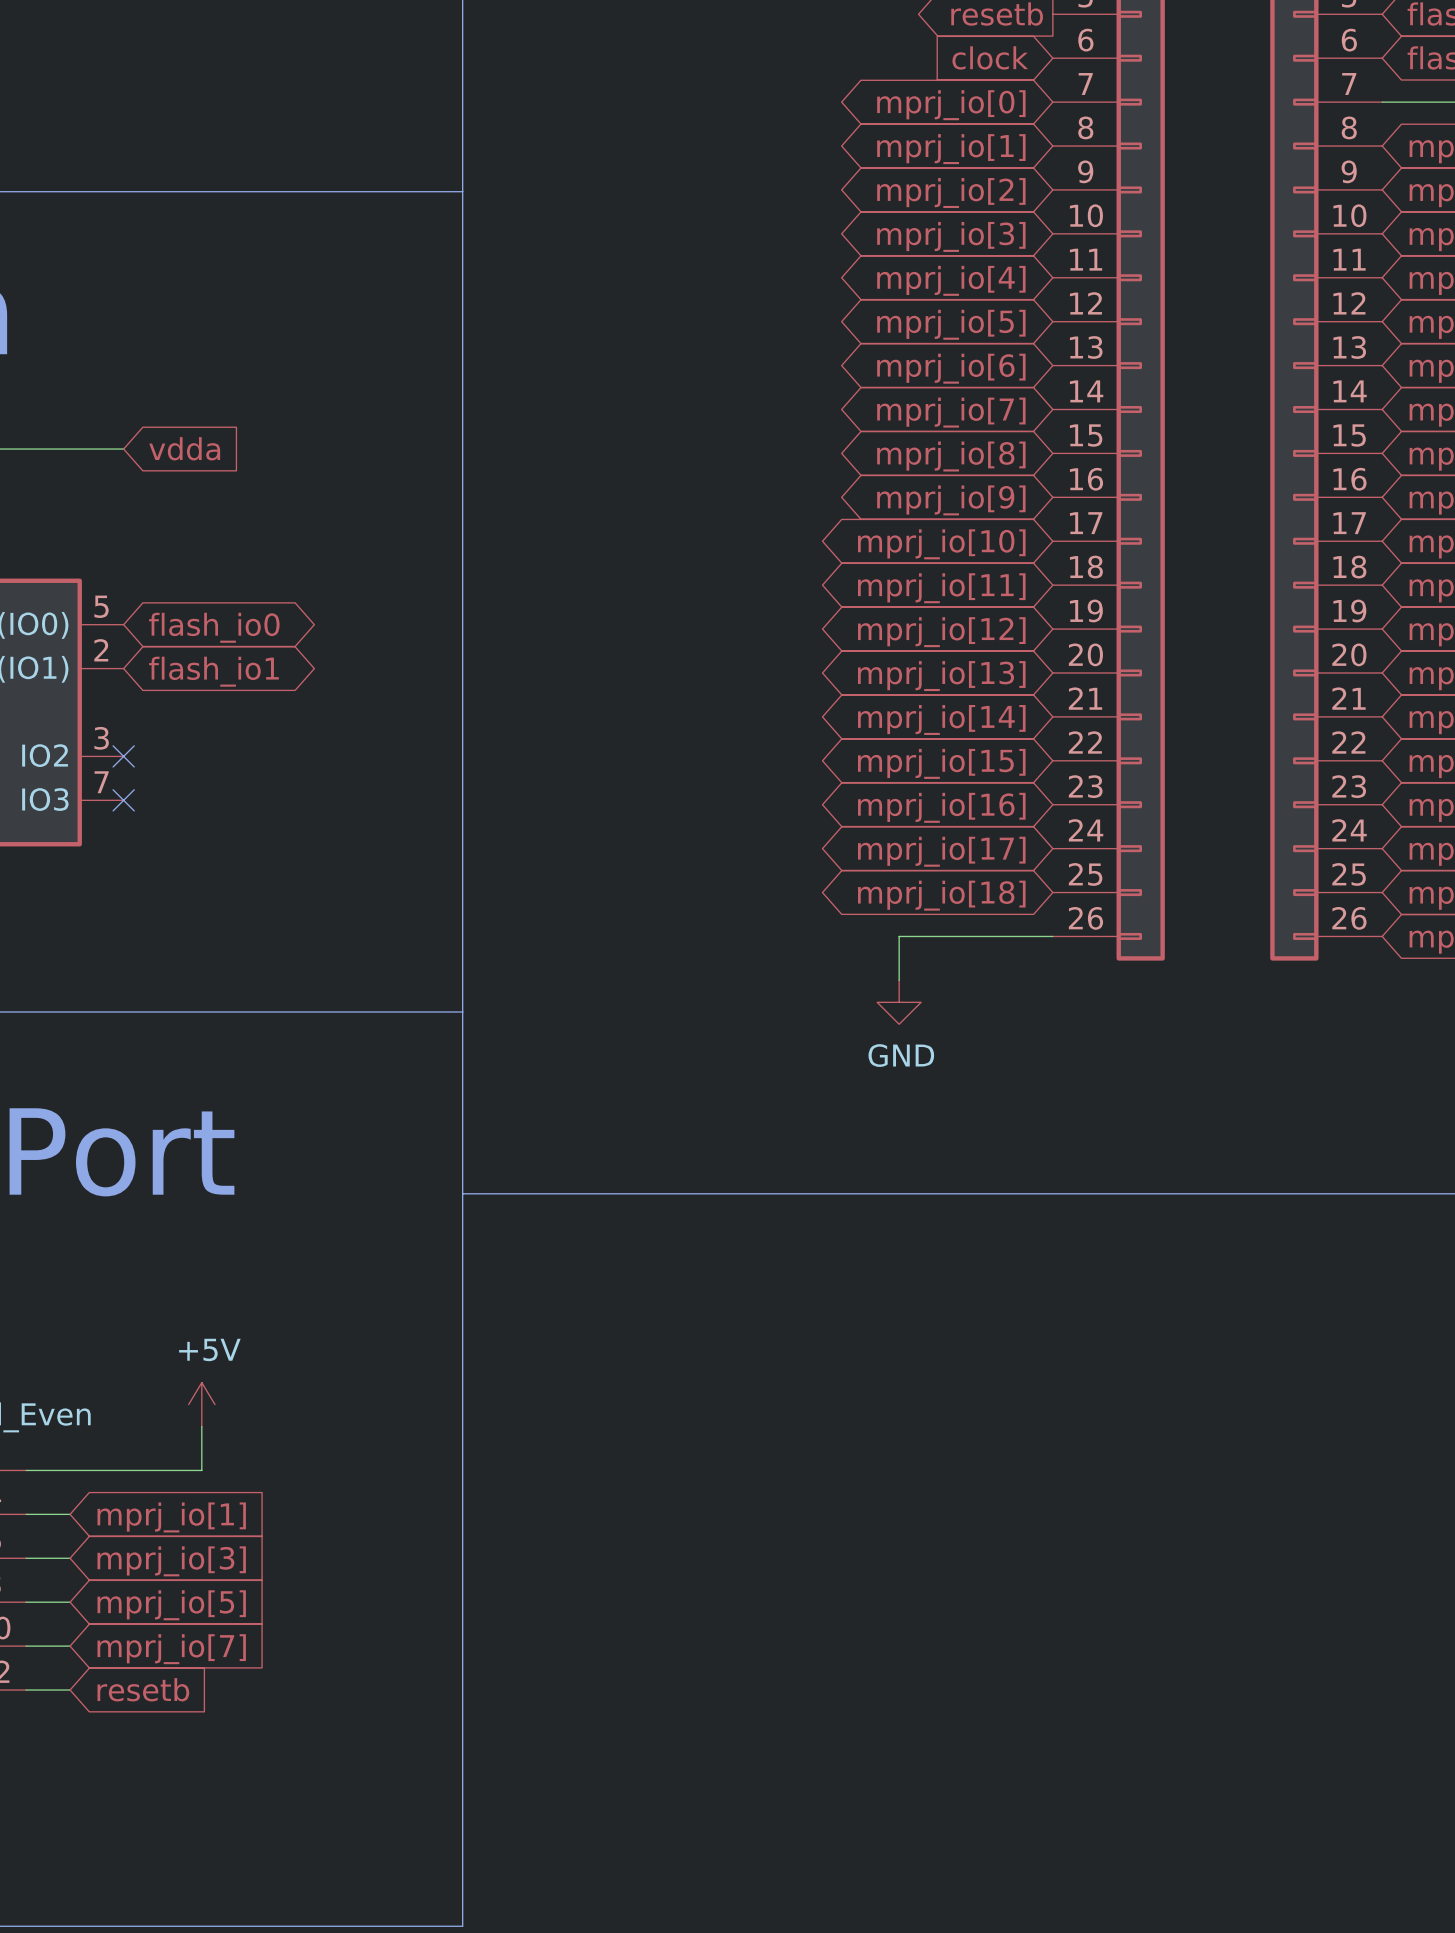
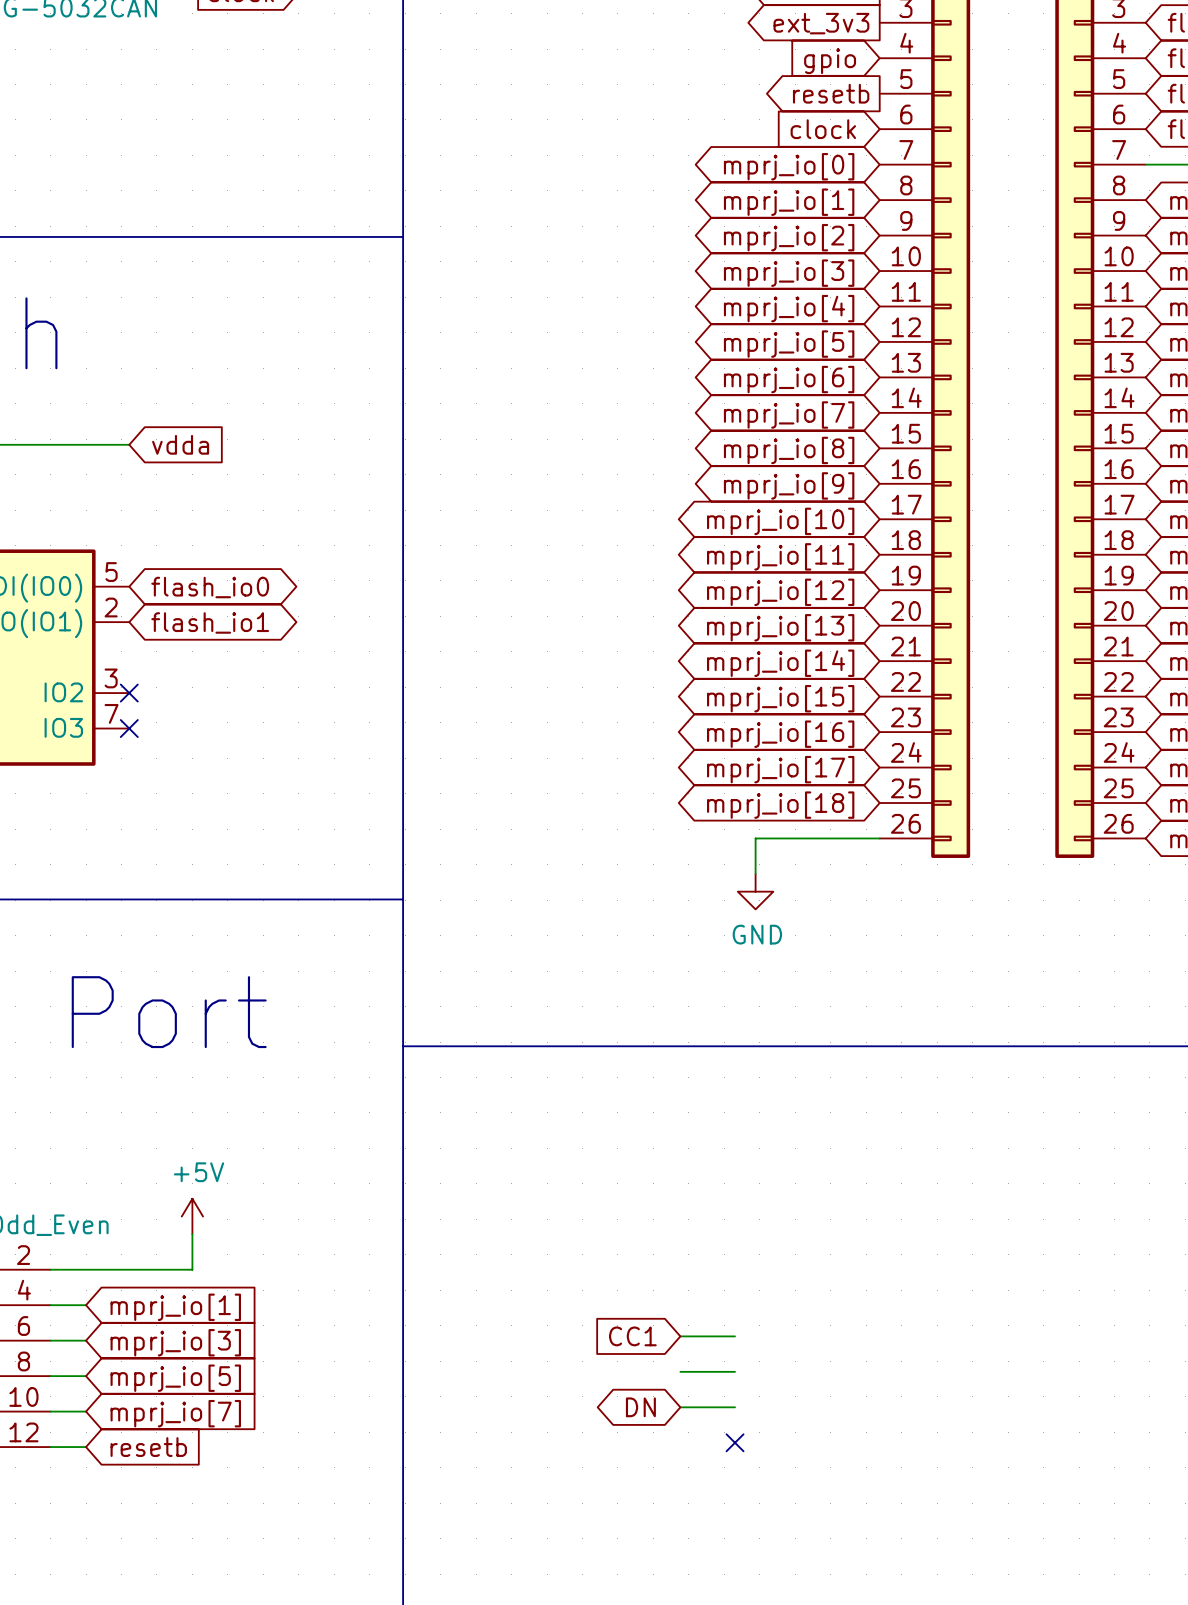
global label: none -> CC1 (632, 1336)
wire: none -> (680, 1336) (735, 1336)
wire: none -> (680, 1371) (735, 1371)
global label: none -> DN (640, 1407)
wire: none -> (680, 1407) (735, 1407)
no-connect mark: none -> (735, 1442)

